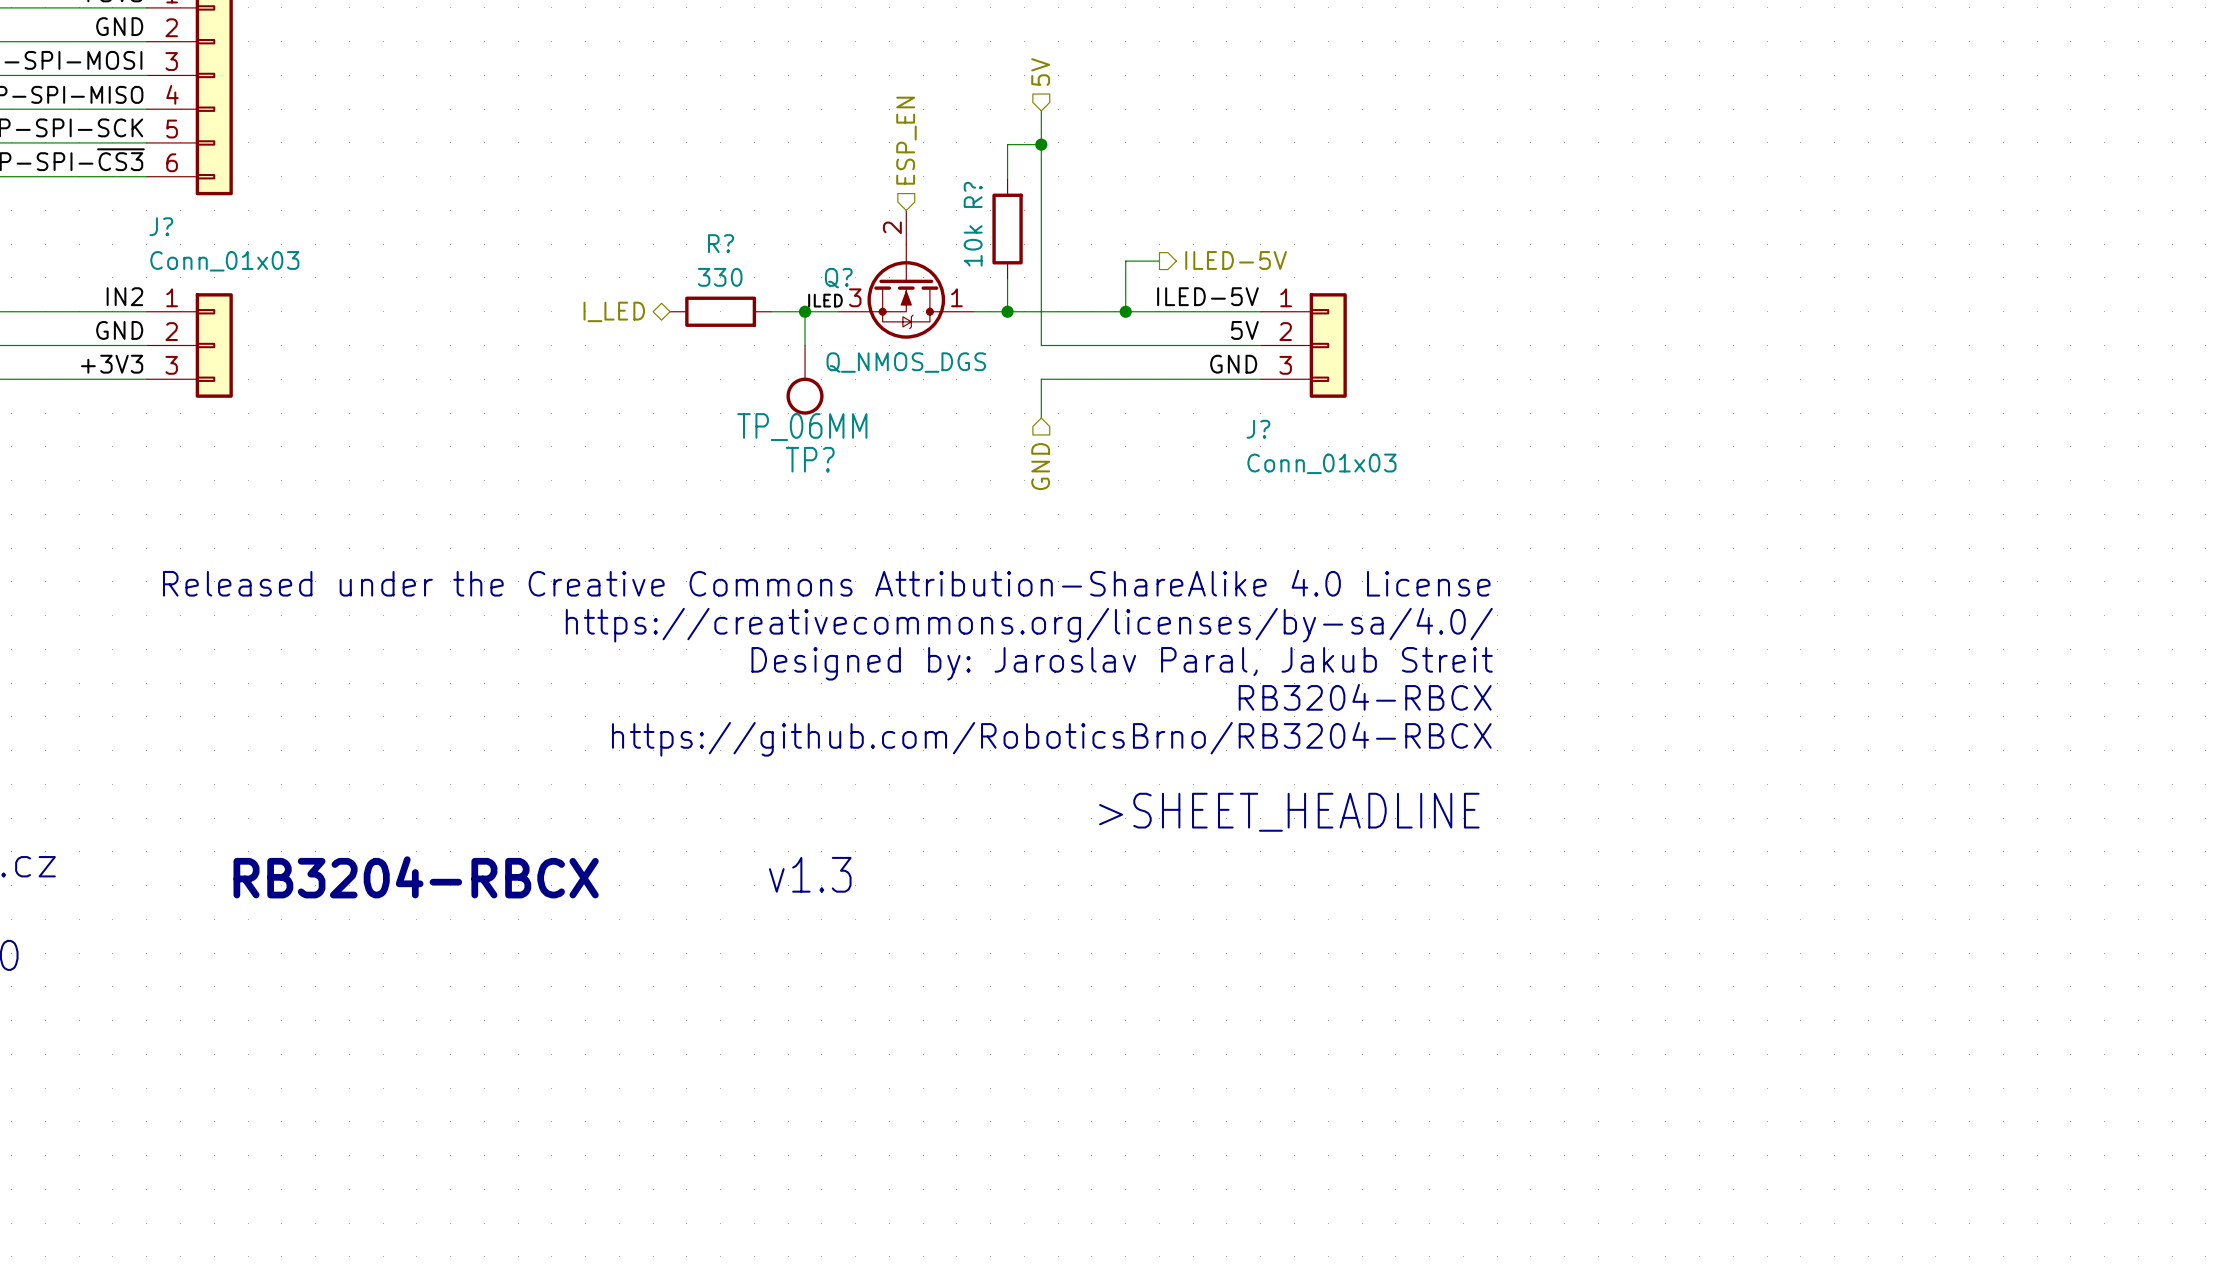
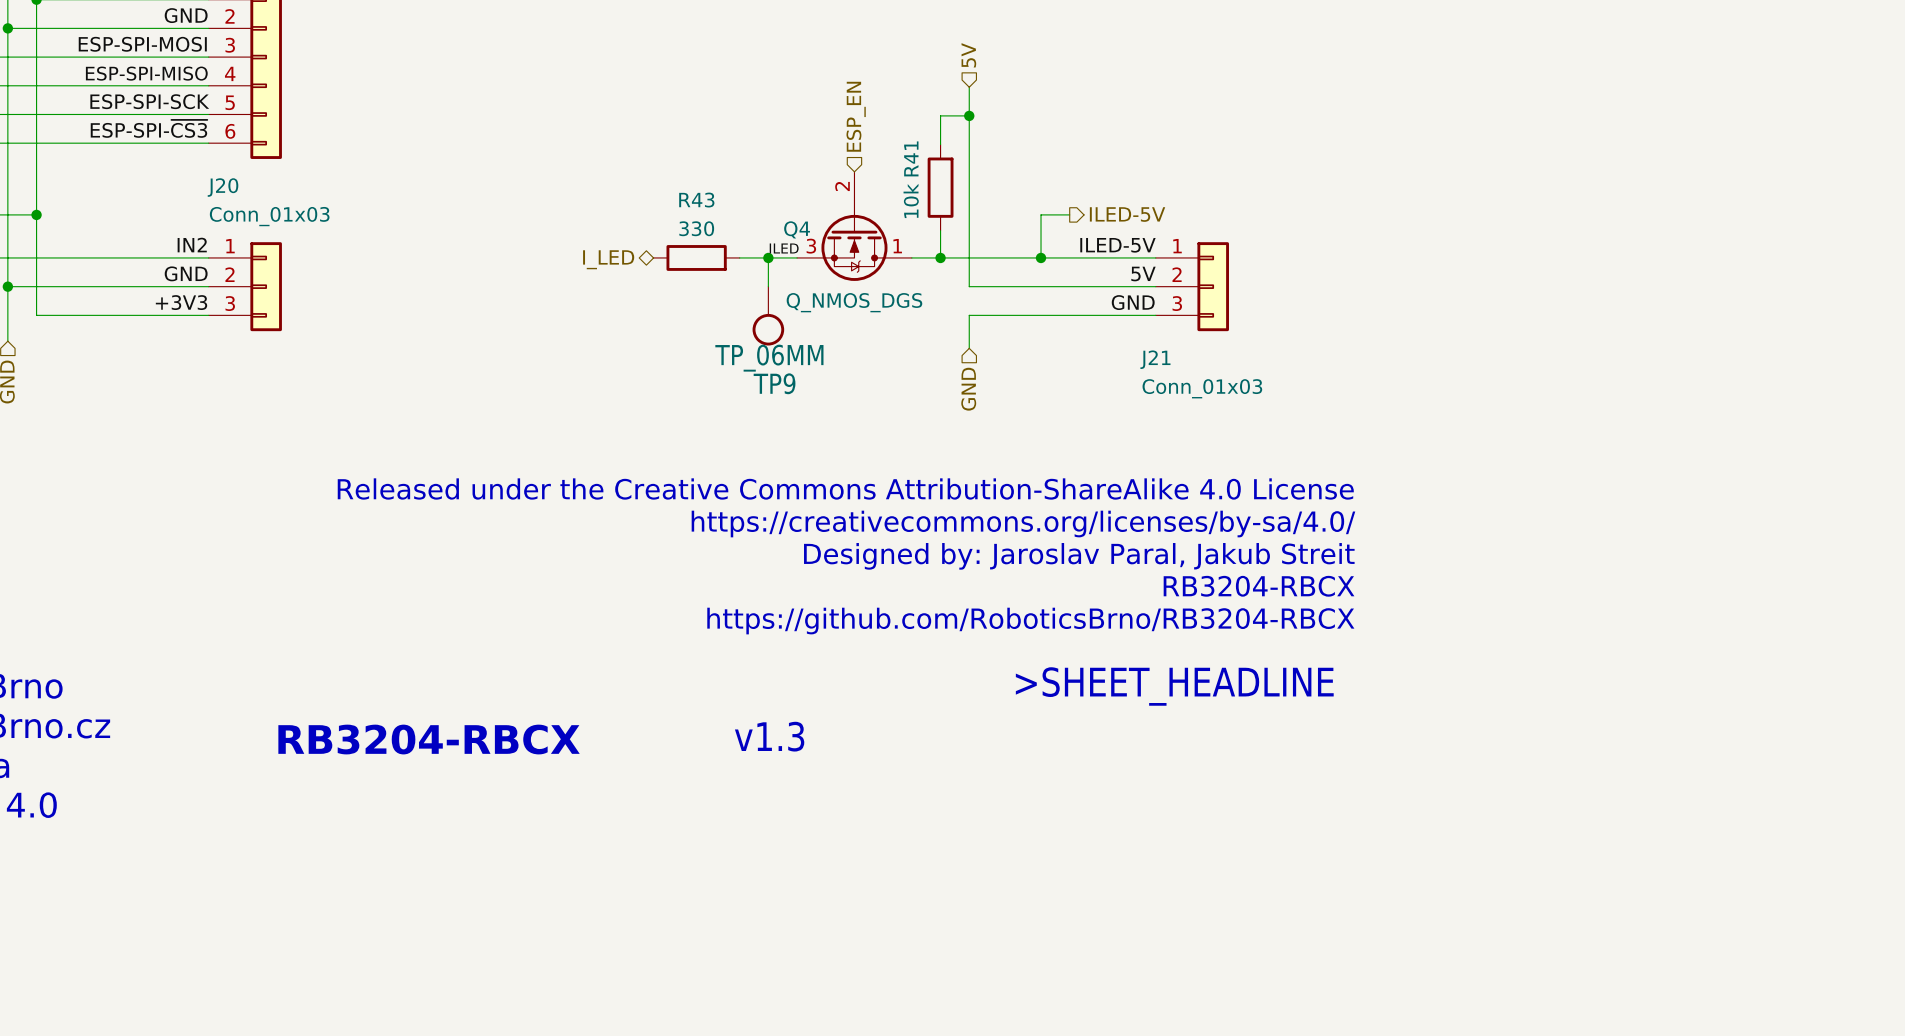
R? name: R? (973, 194) -> R41 (911, 158)
J? name: J? (161, 226) -> J20 (223, 187)
R? name: R? (721, 243) -> R43 (696, 200)
Q? name: Q? (838, 278) -> Q4 (797, 229)
J? name: J? (1258, 429) -> J21 (1155, 359)
TP? name: TP? (810, 459) -> TP9 (774, 383)

